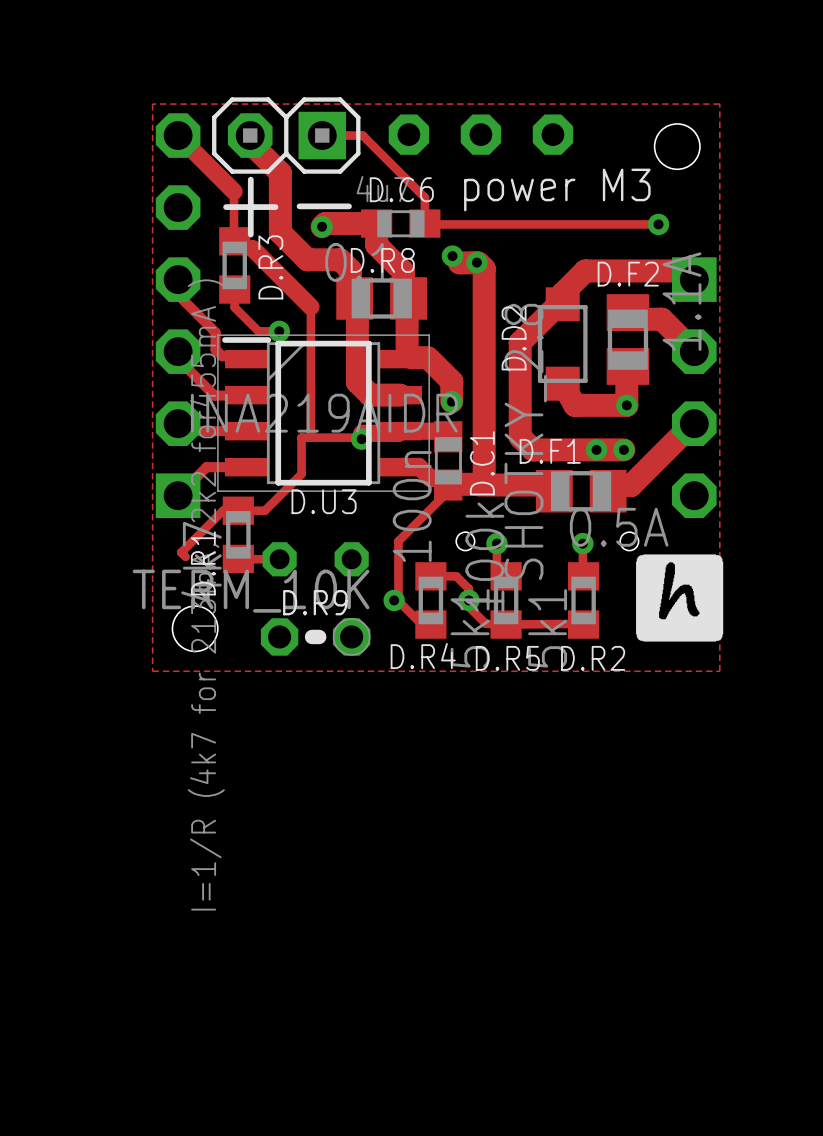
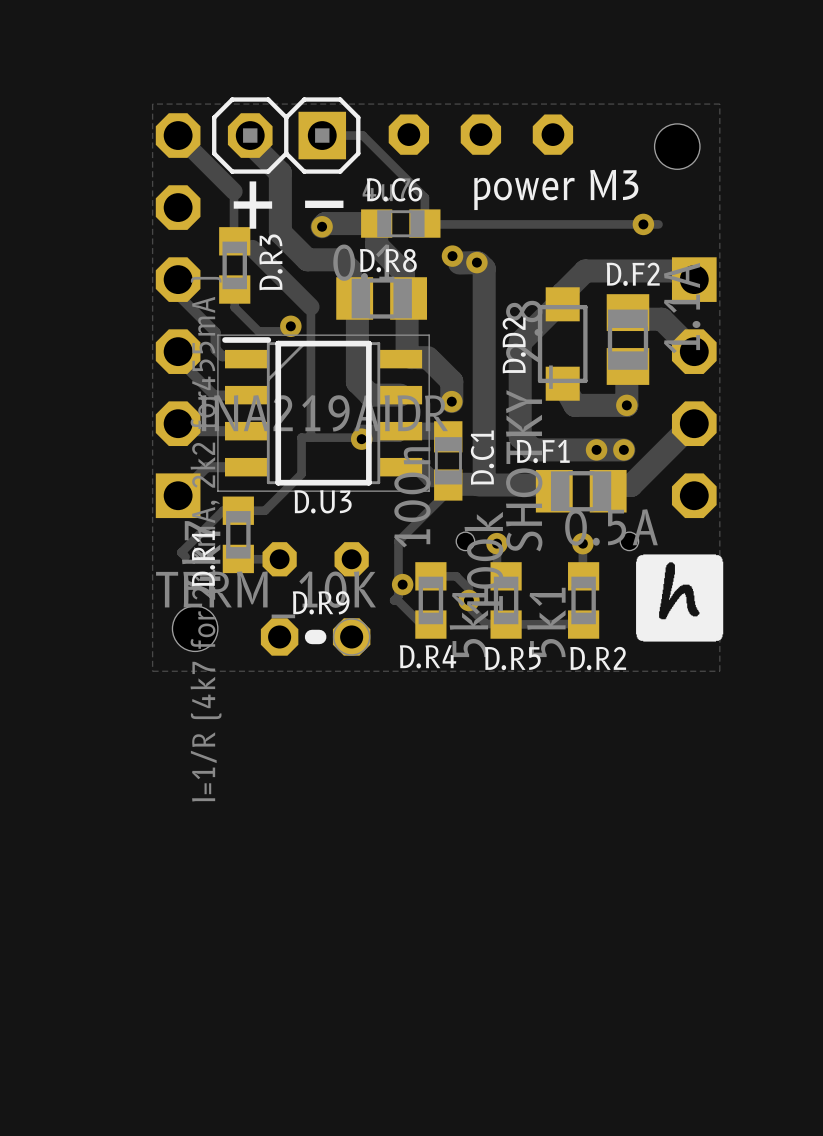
via position: (658, 224) -> (643, 224)
via position: (279, 331) -> (290, 326)
via position: (394, 600) -> (402, 584)

